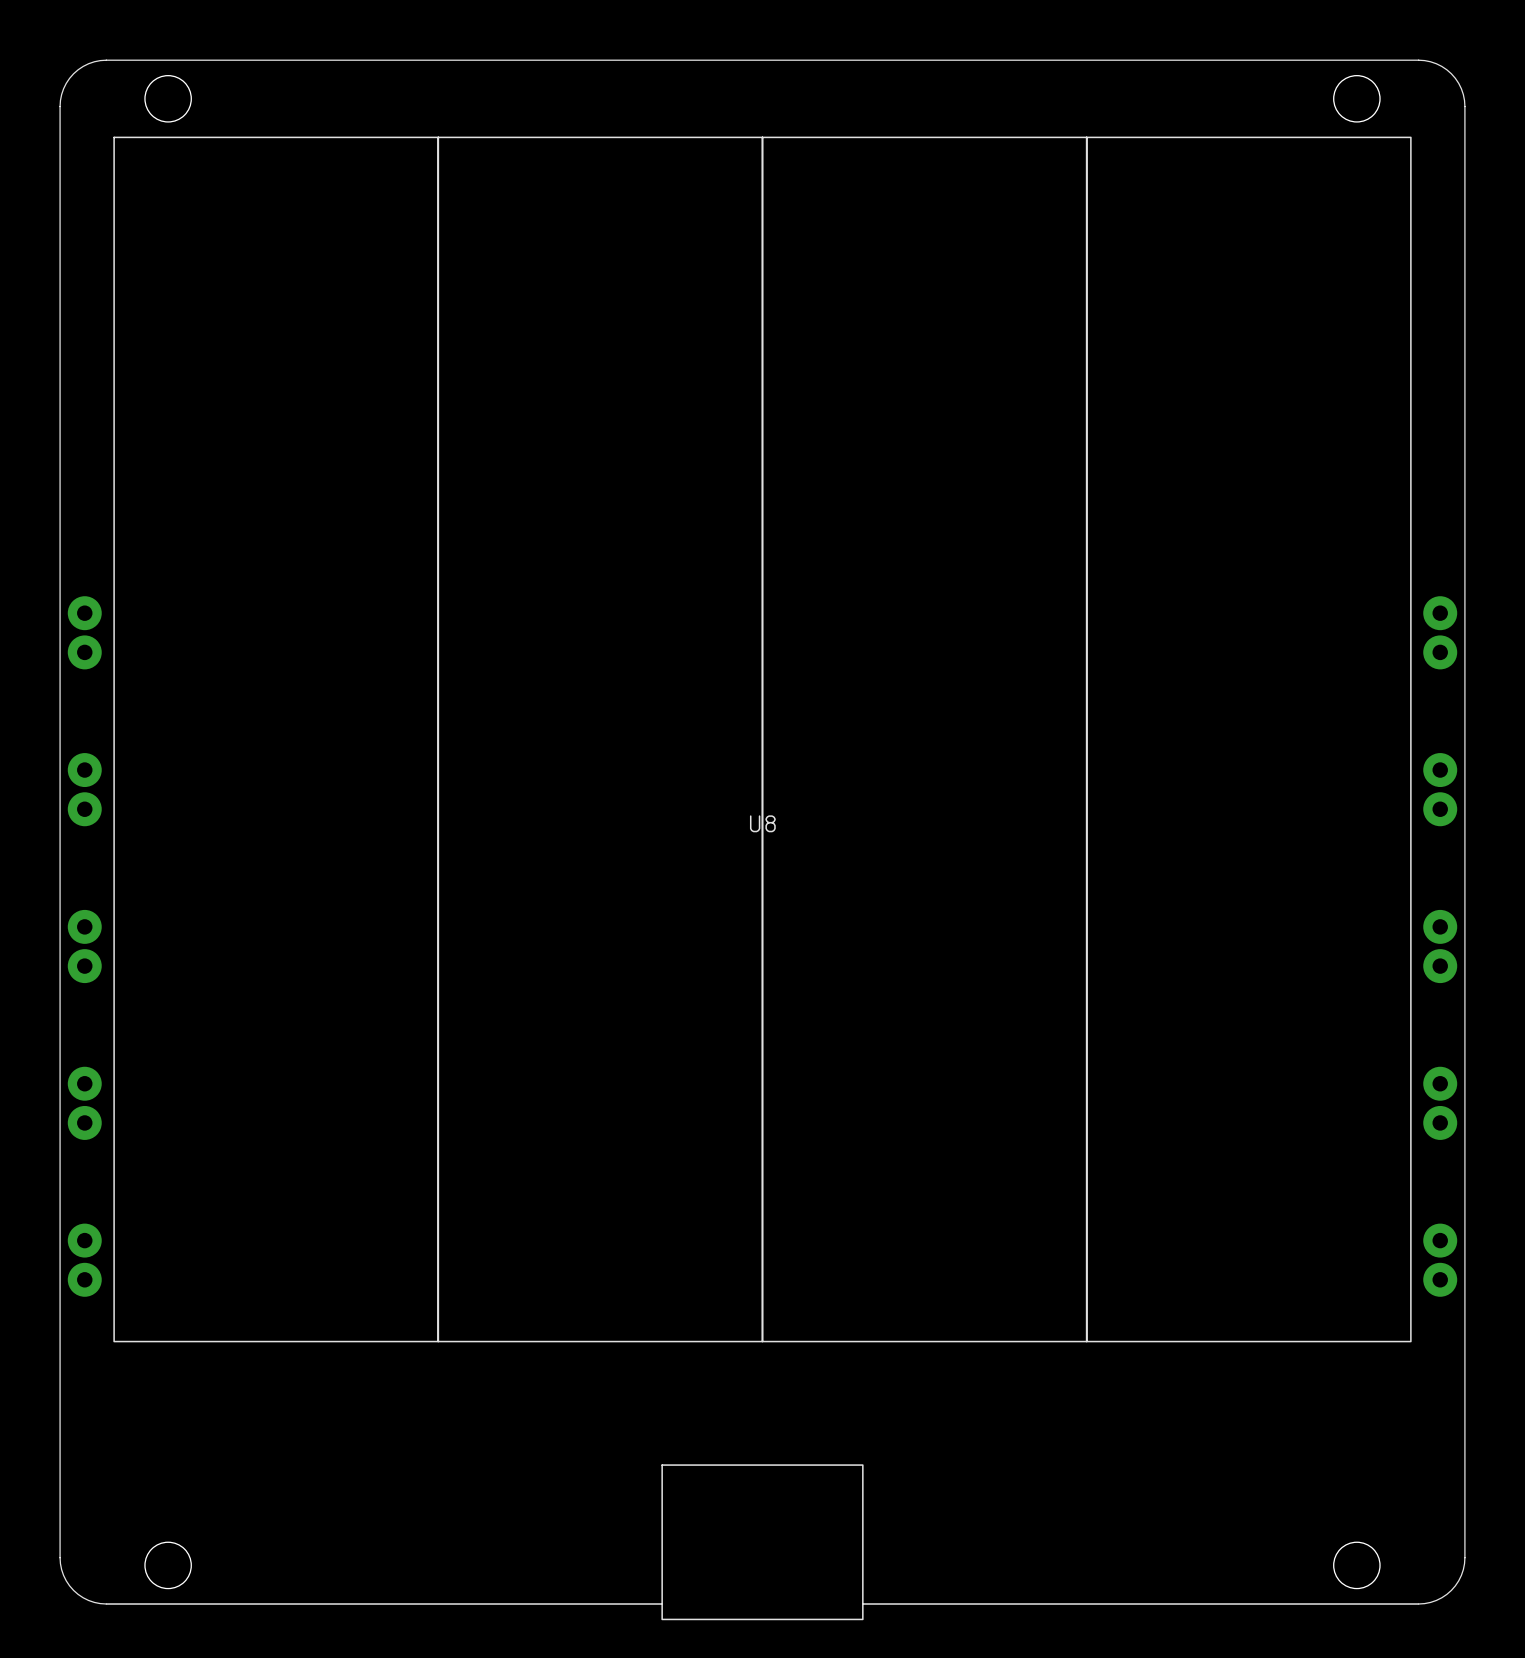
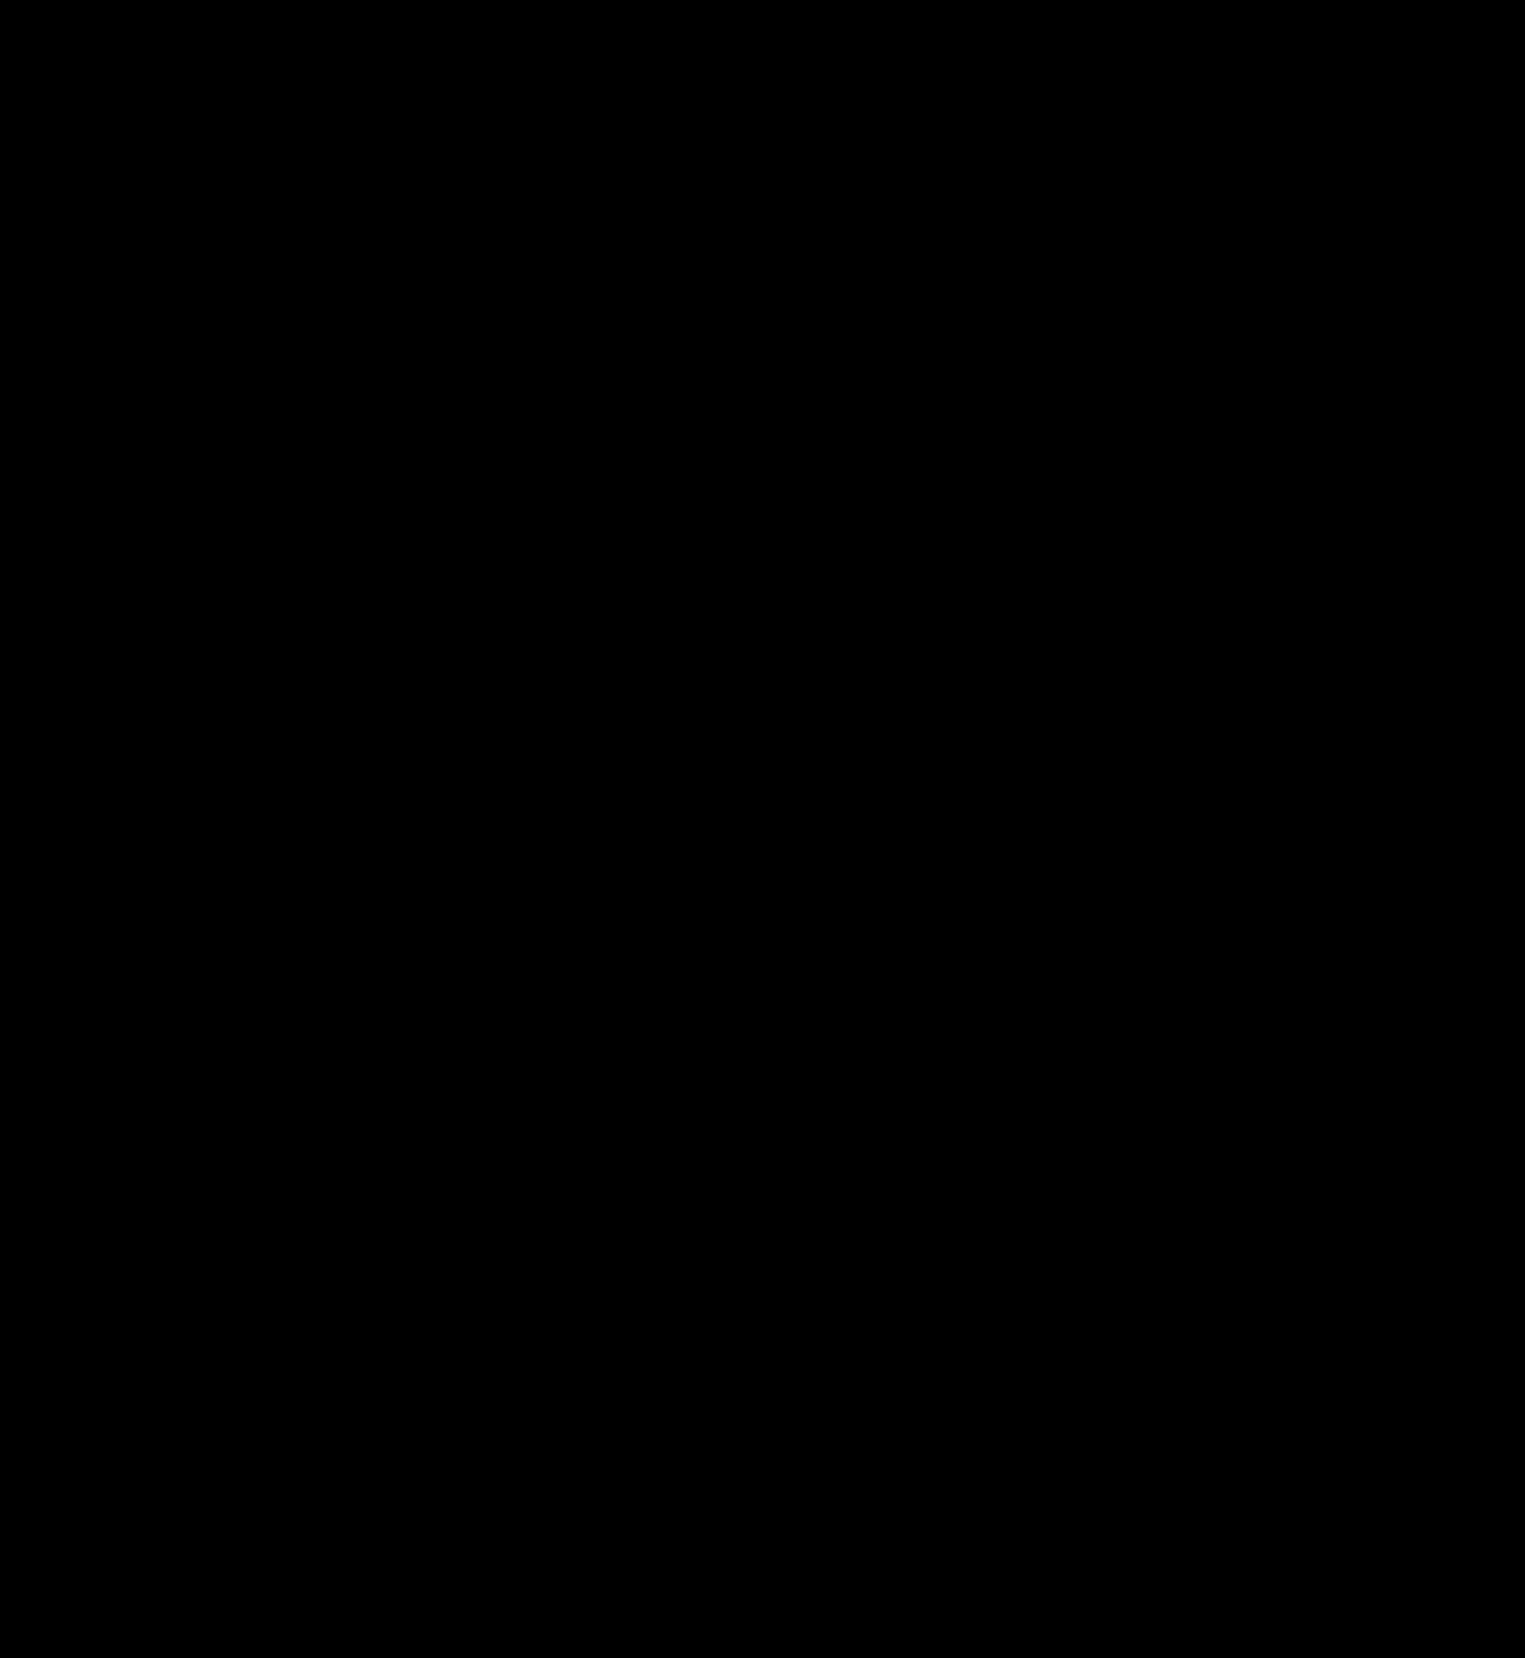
U8: (762, 840) -> none

